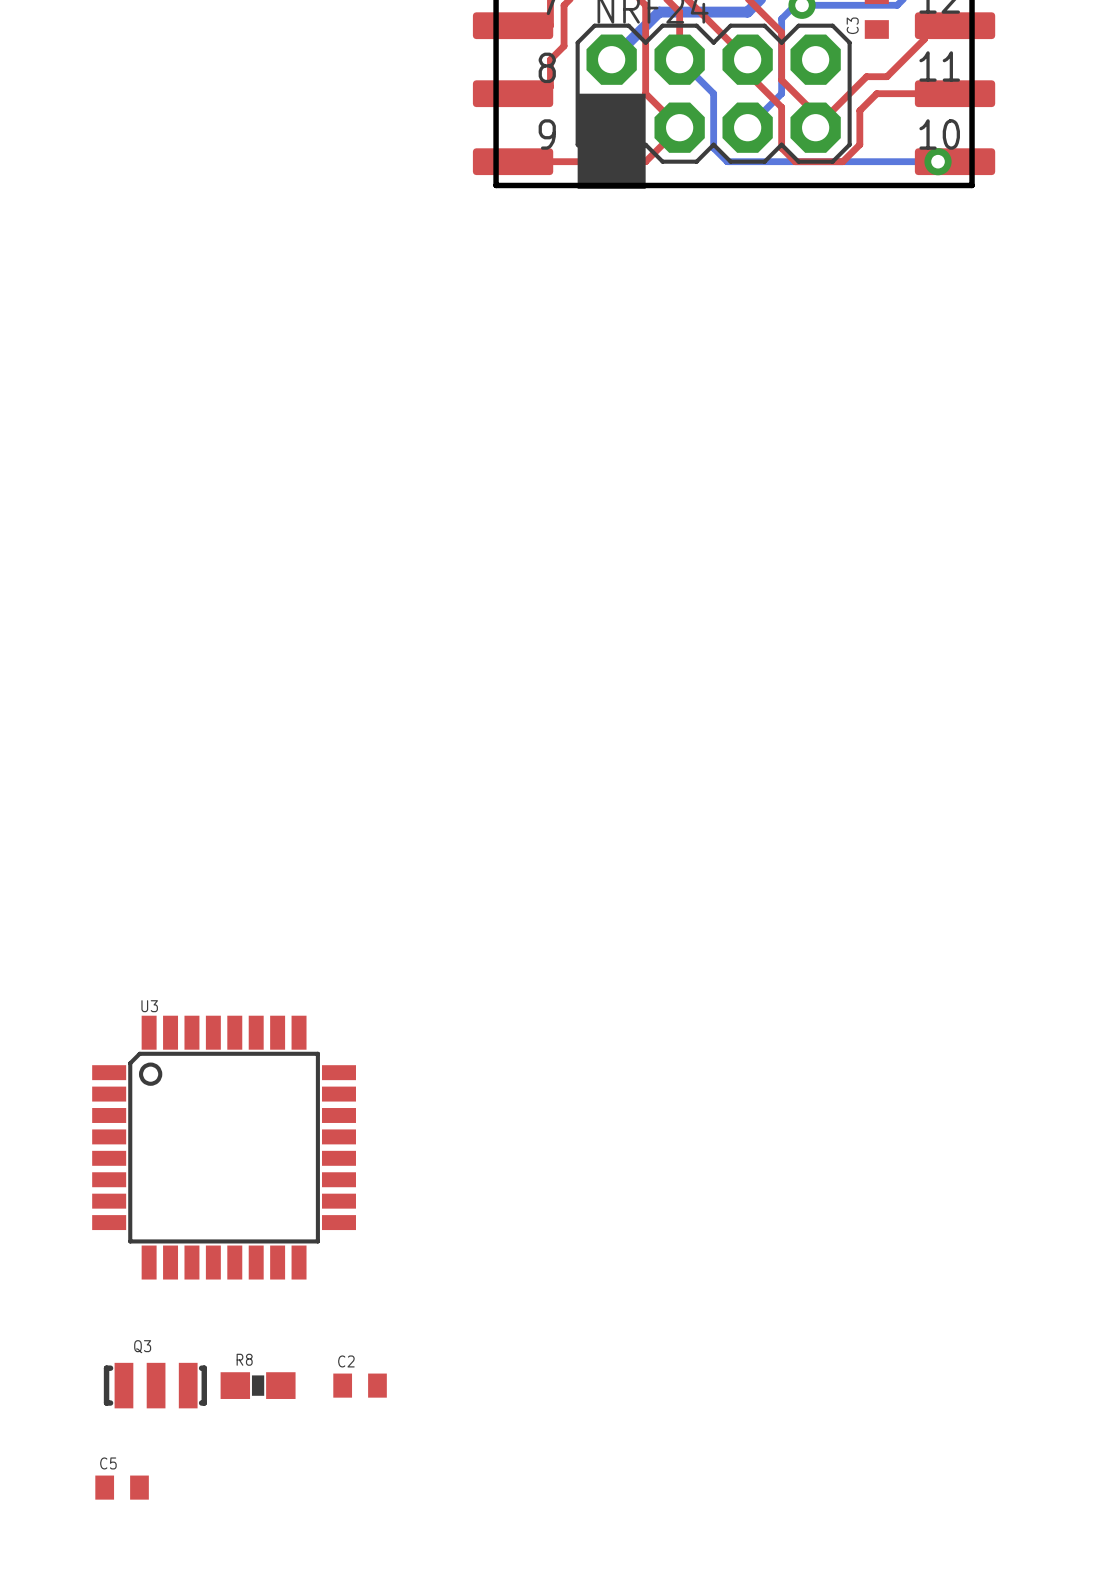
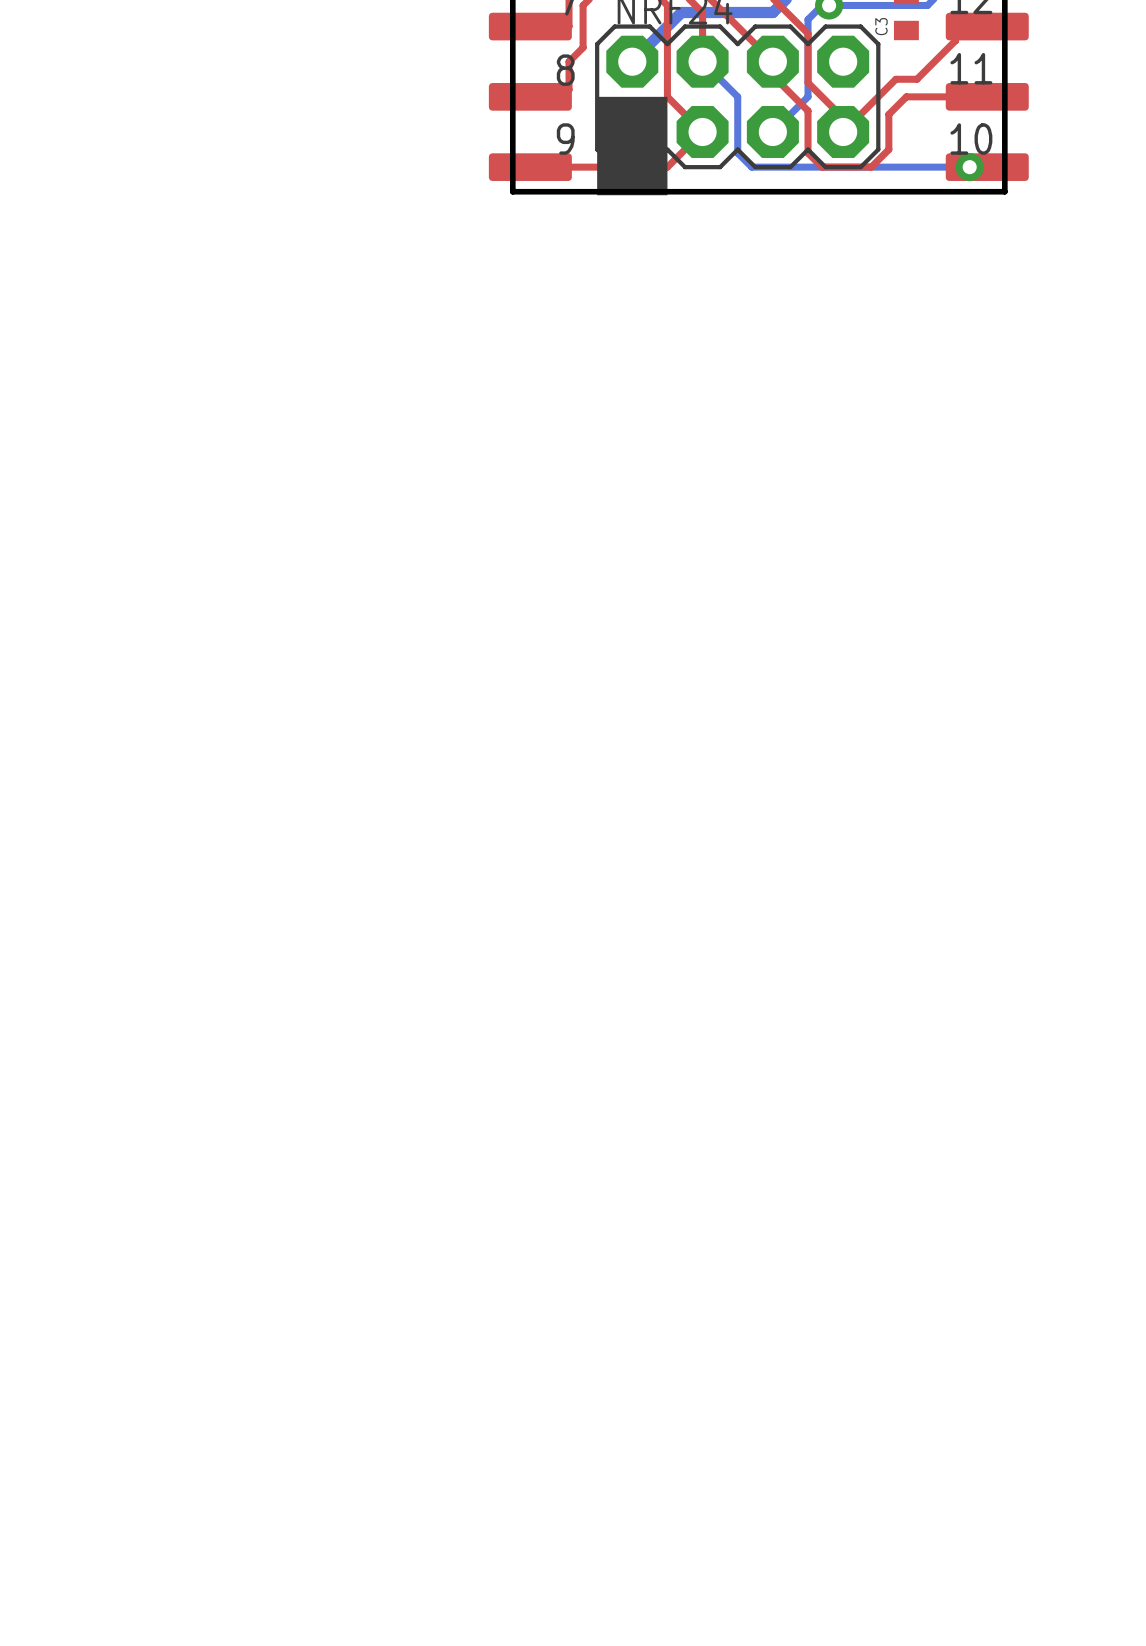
U3: (224, 1147) -> none
Q3: (155, 1385) -> none
R8: (258, 1385) -> none
C2: (360, 1385) -> none
C5: (122, 1487) -> none

